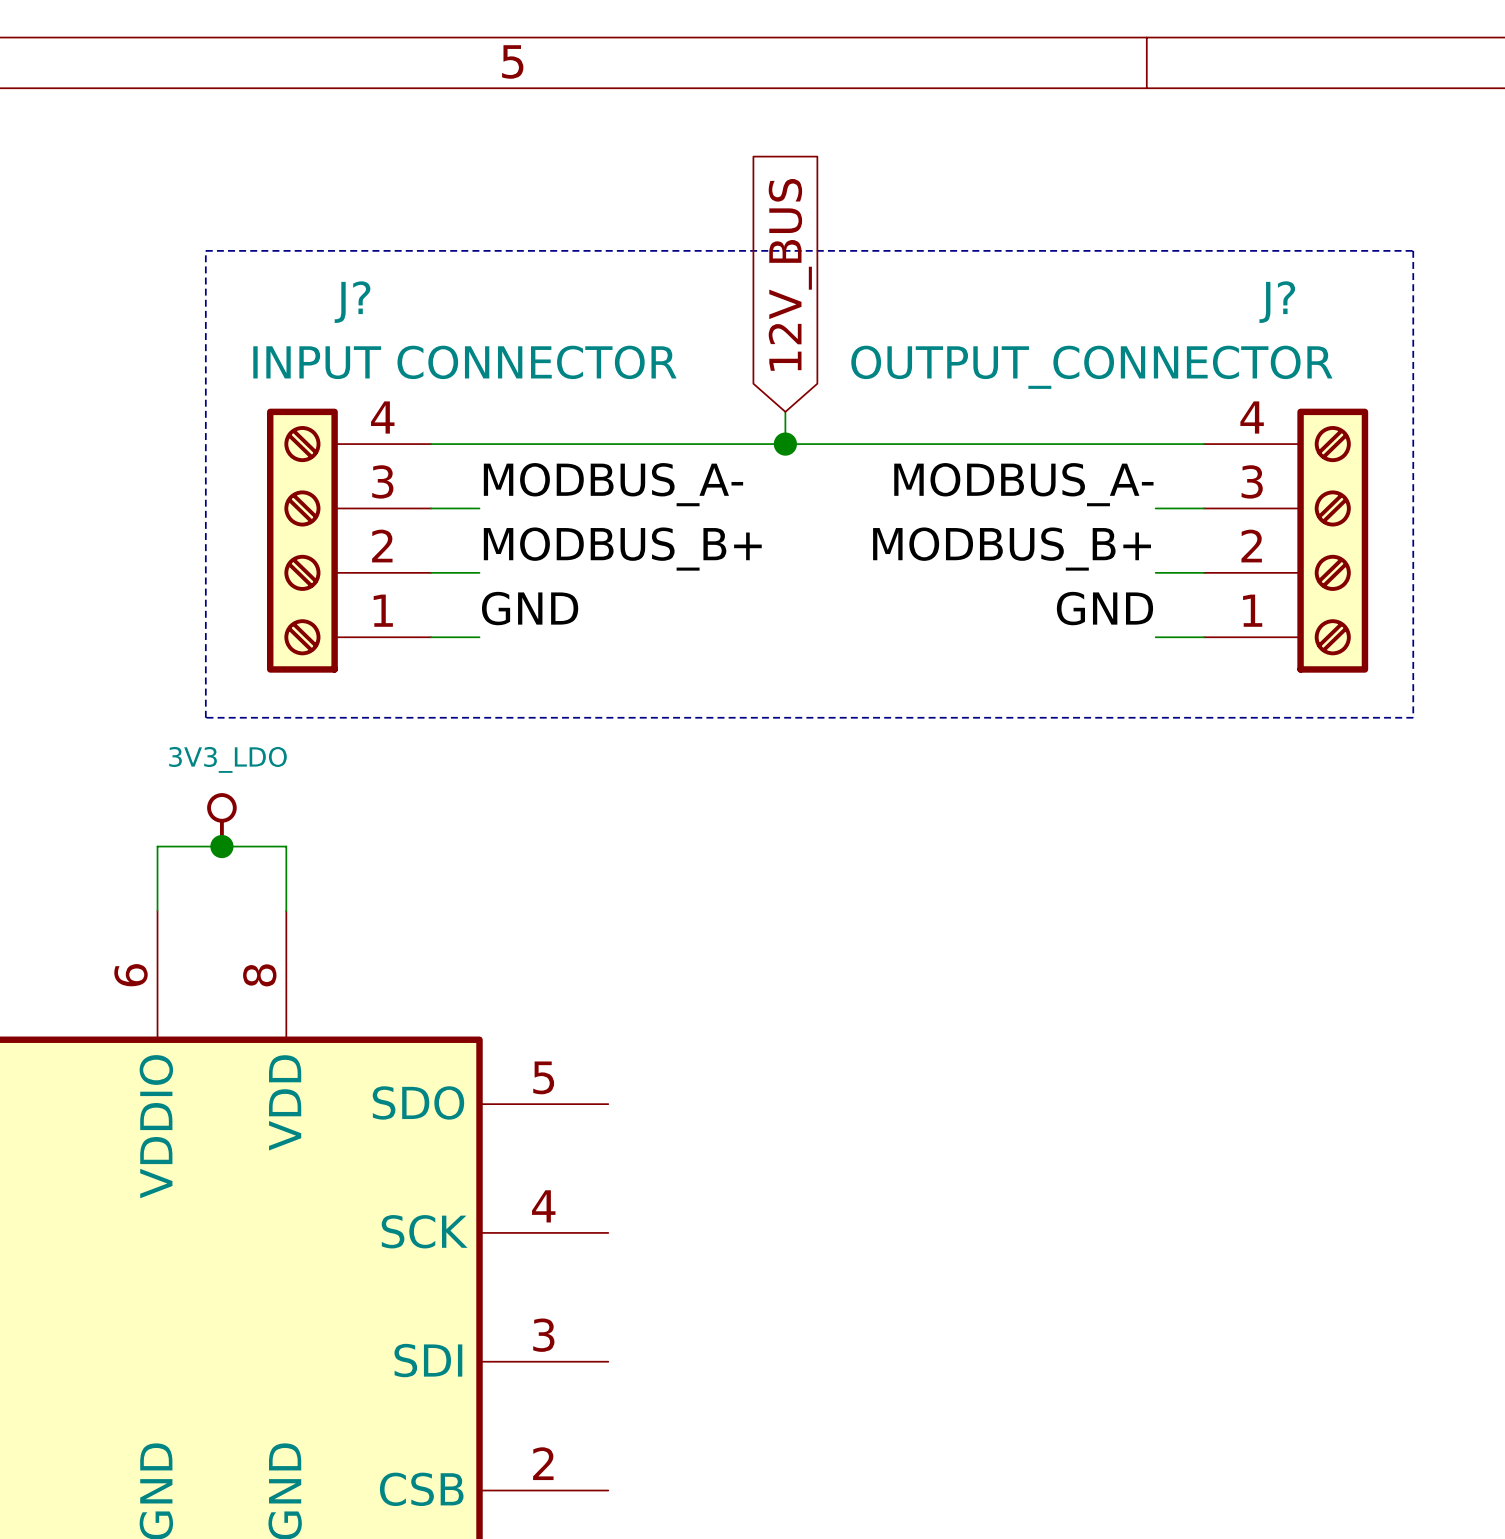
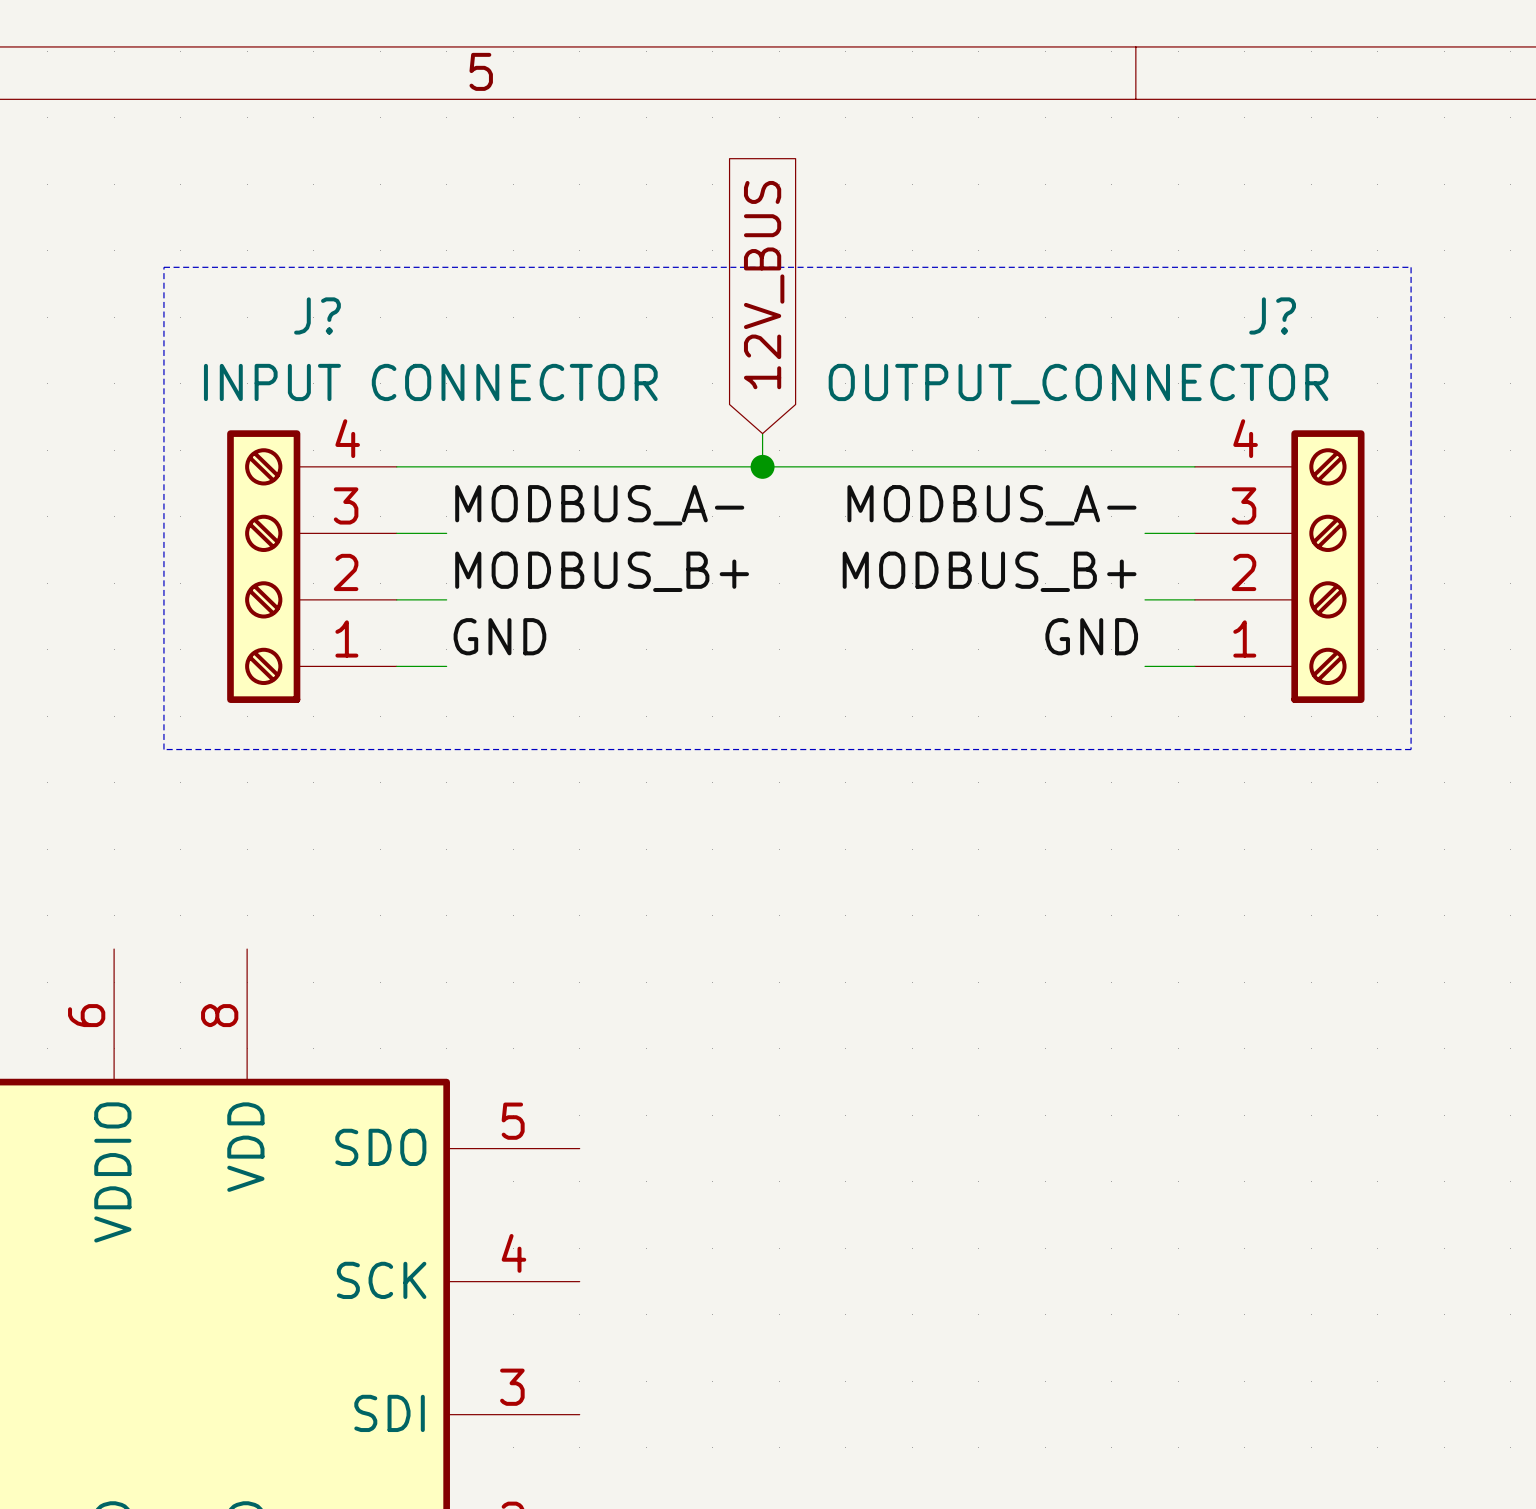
power symbol: 3V3_LDO (221, 820) -> none
junction: (221, 846) -> none
wire: (157, 910) (157, 846) (286, 846) (286, 910) -> none

